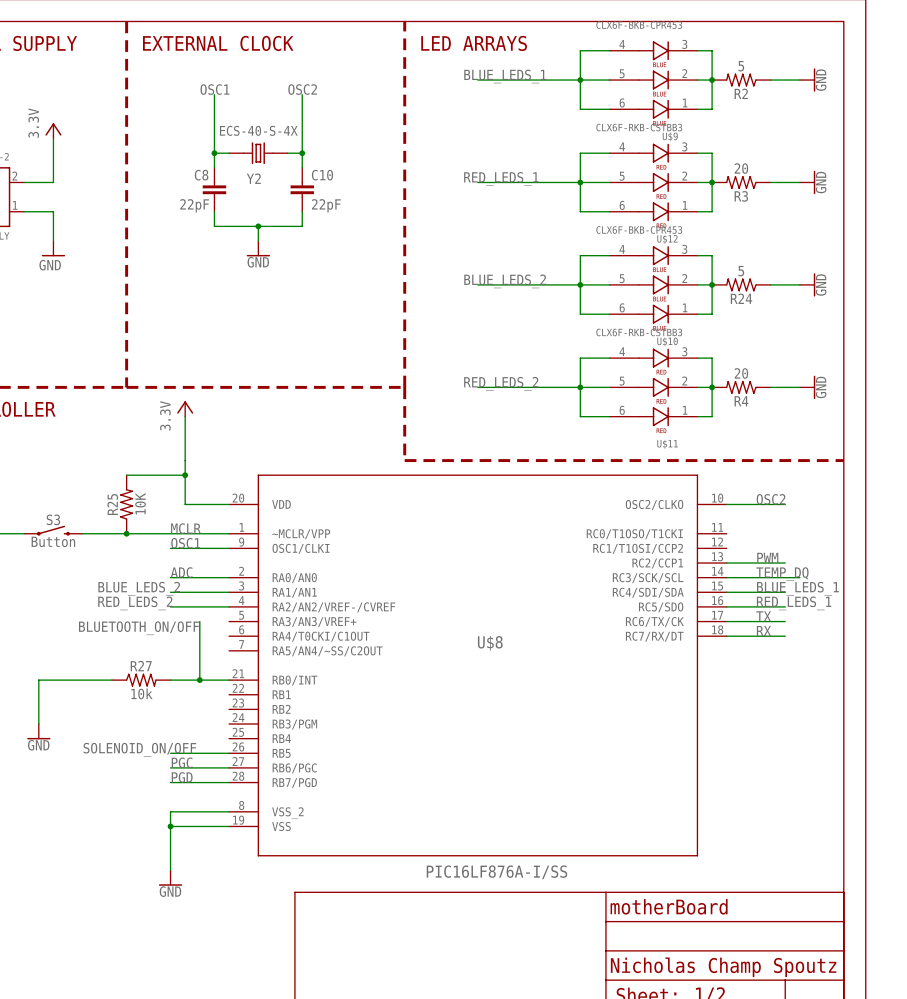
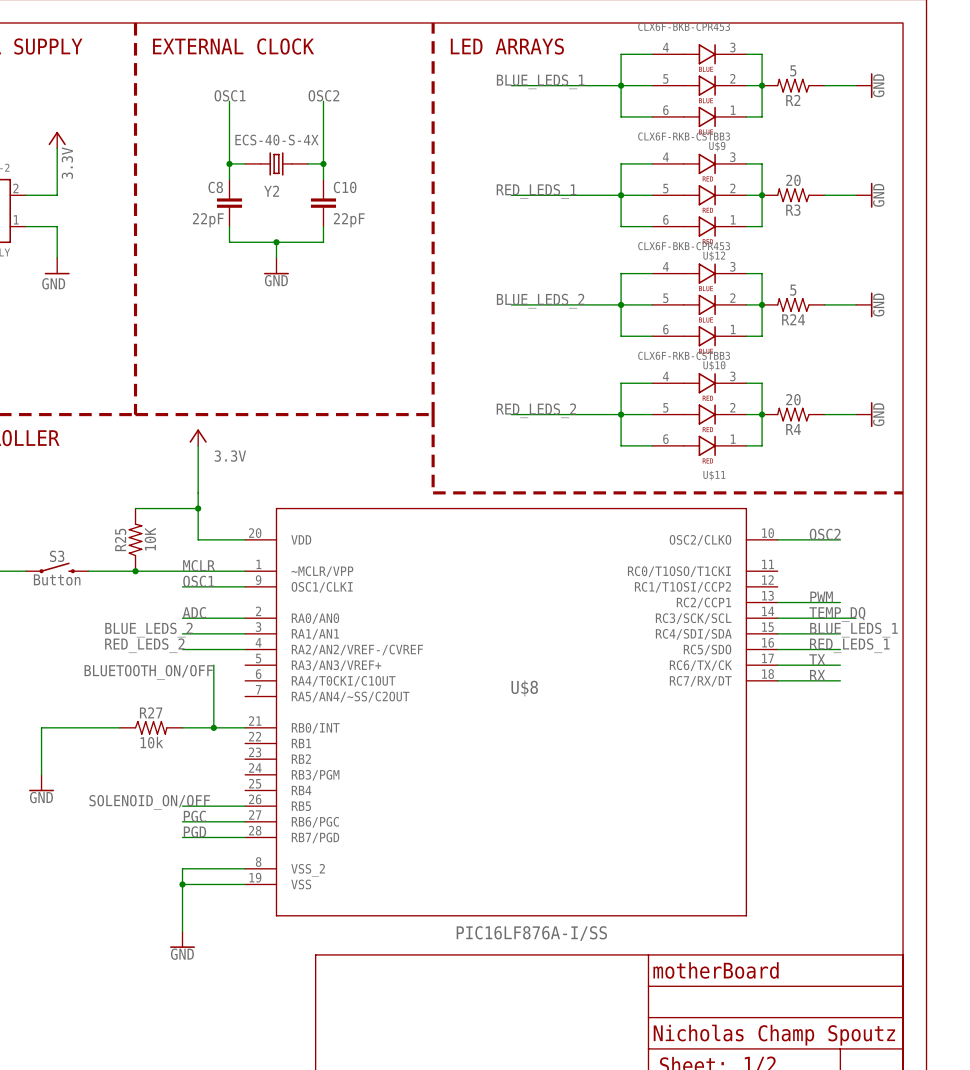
power symbol text: 3.3V (33, 123) -> none
label: none -> 3.3V (67, 163)
power symbol text: 3.3V (165, 415) -> none
label: none -> 3.3V (230, 456)

